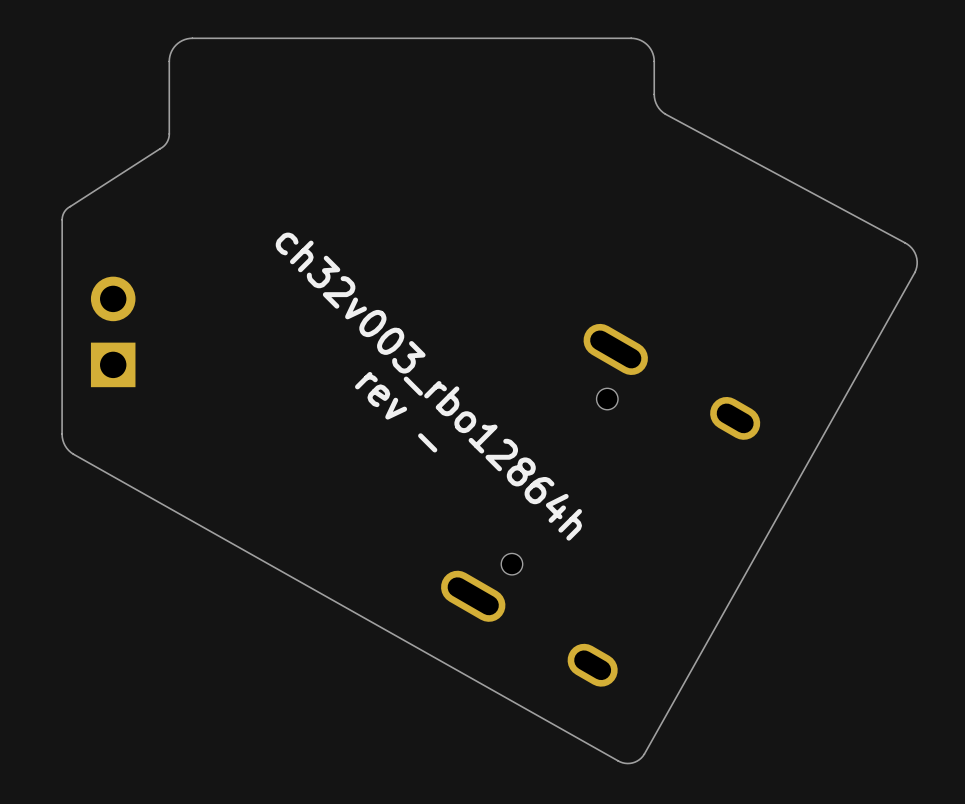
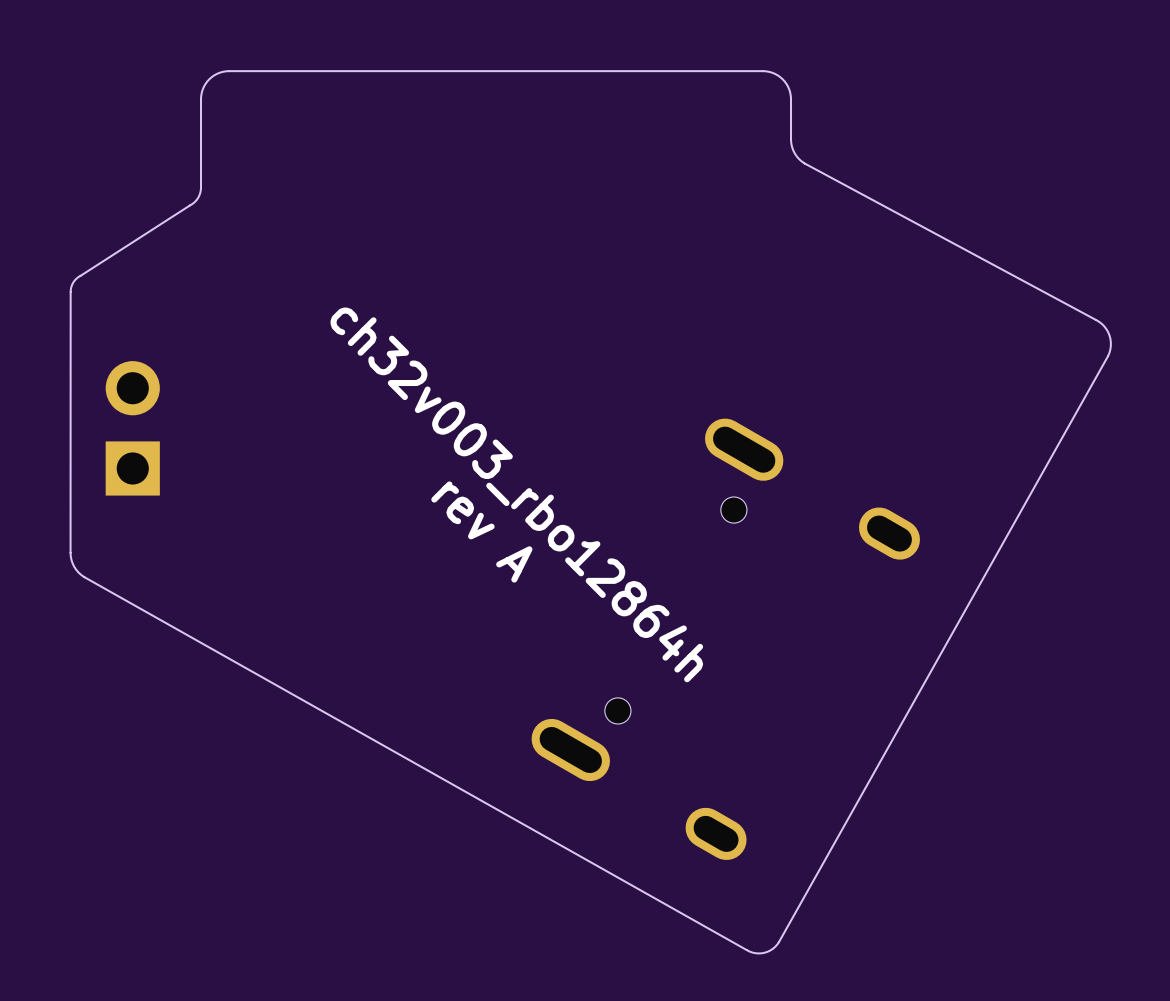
text: rev - (396, 412) -> rev A (481, 532)

